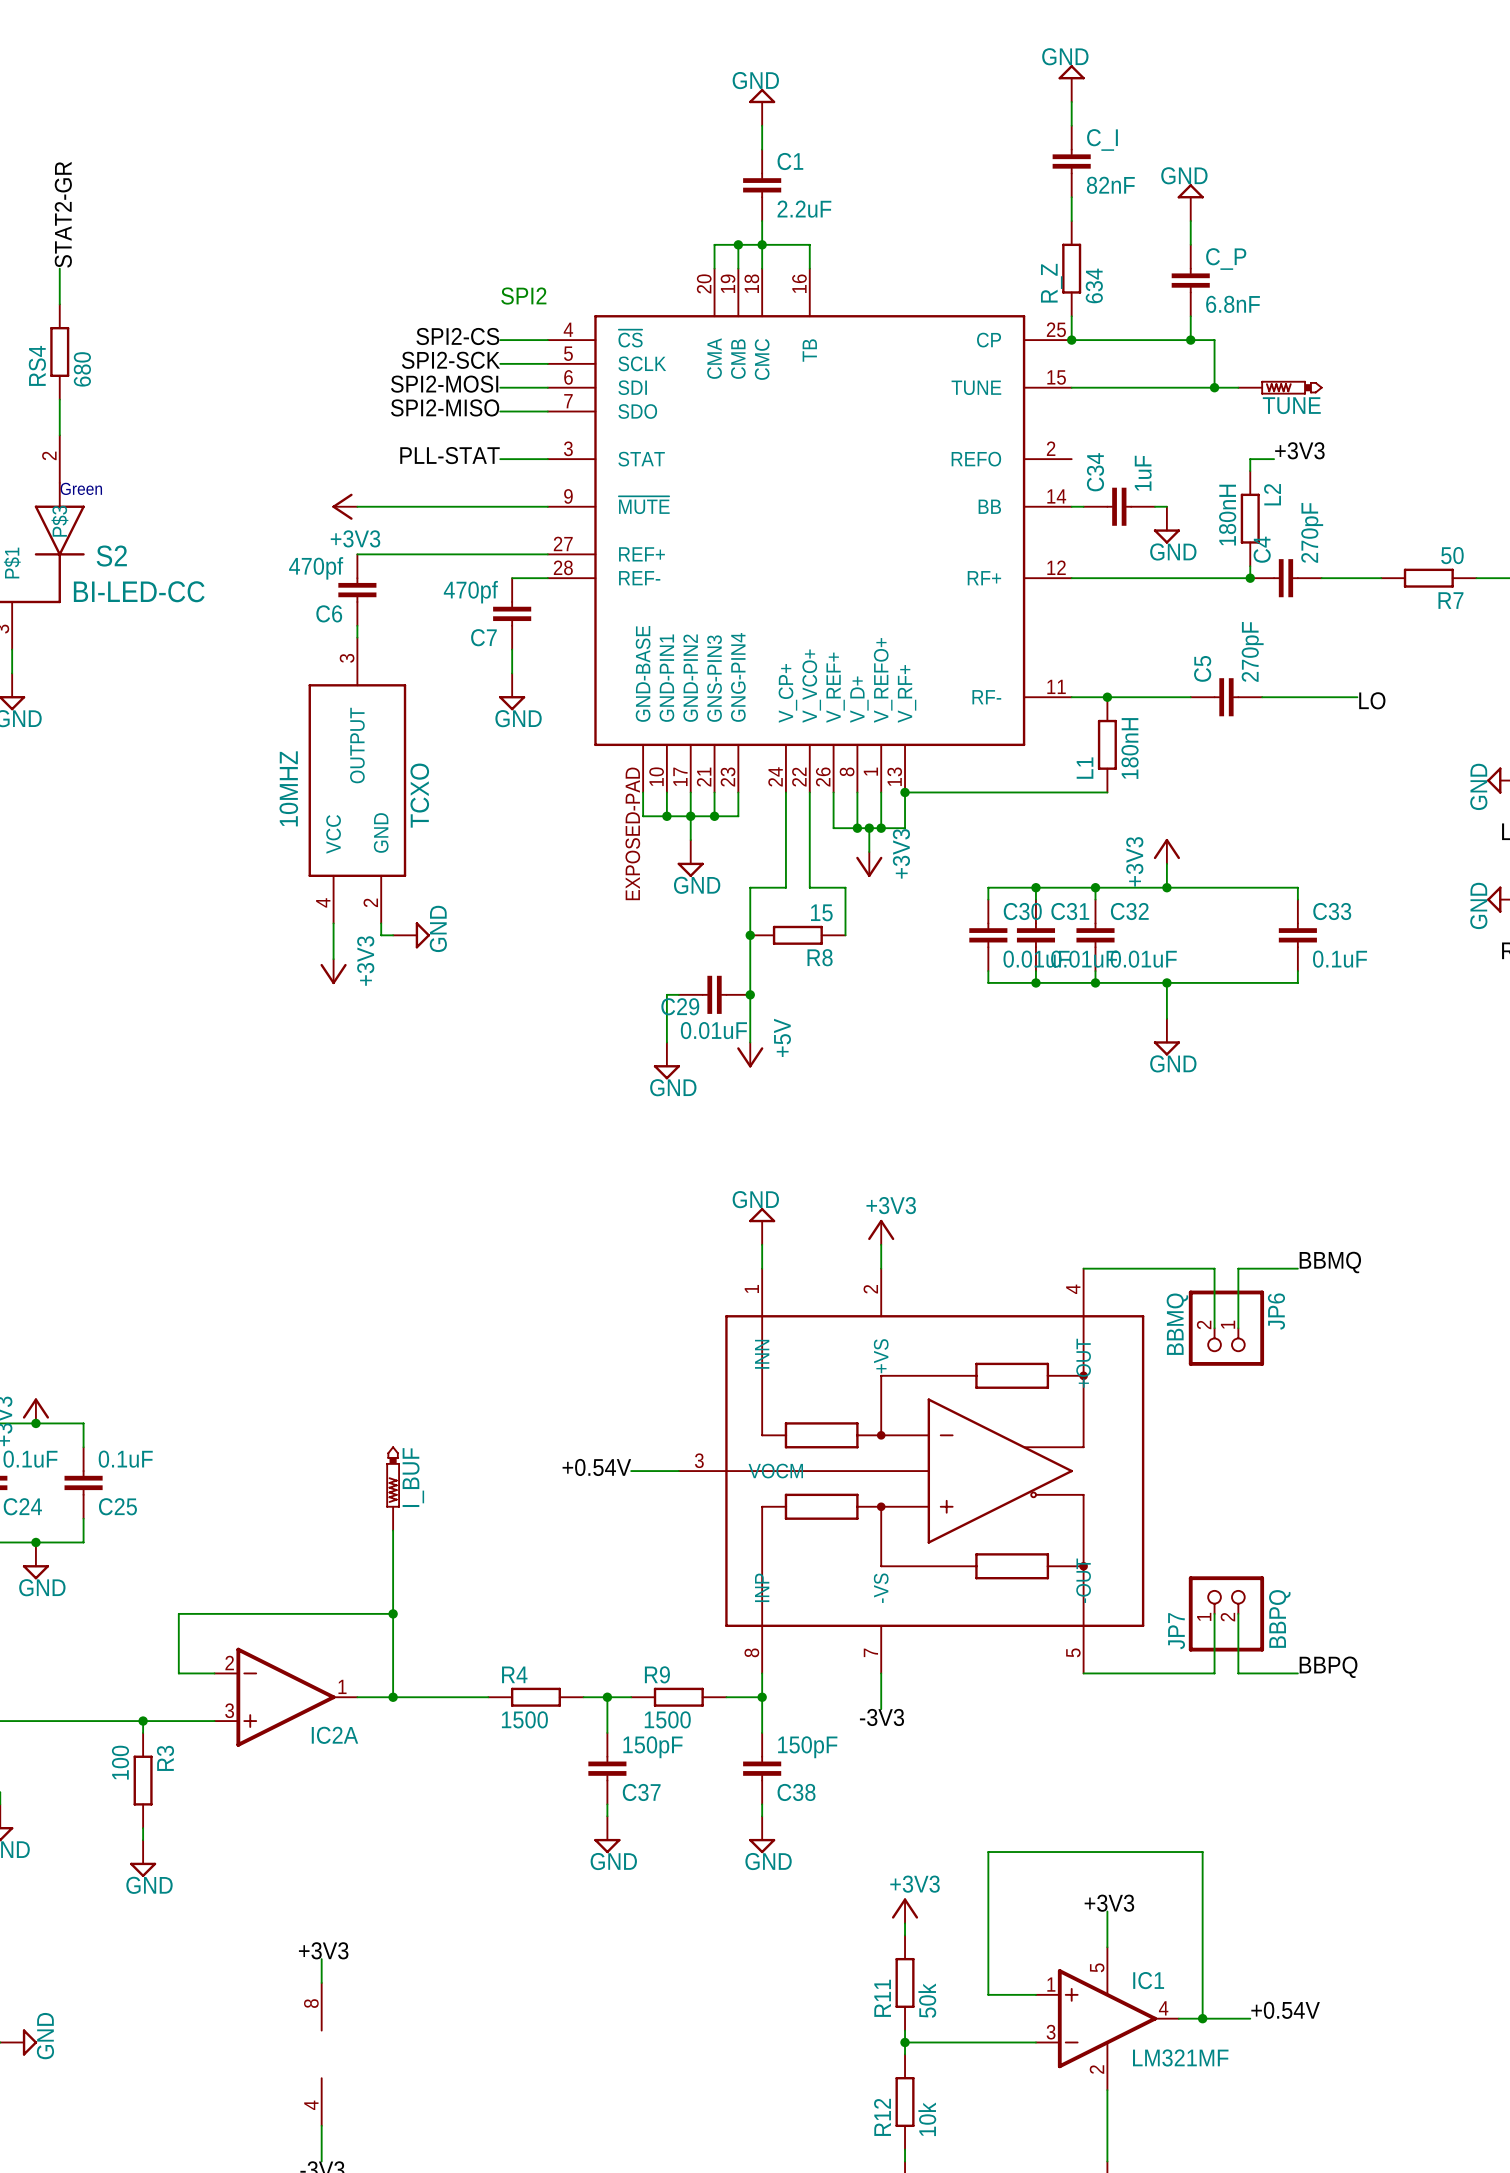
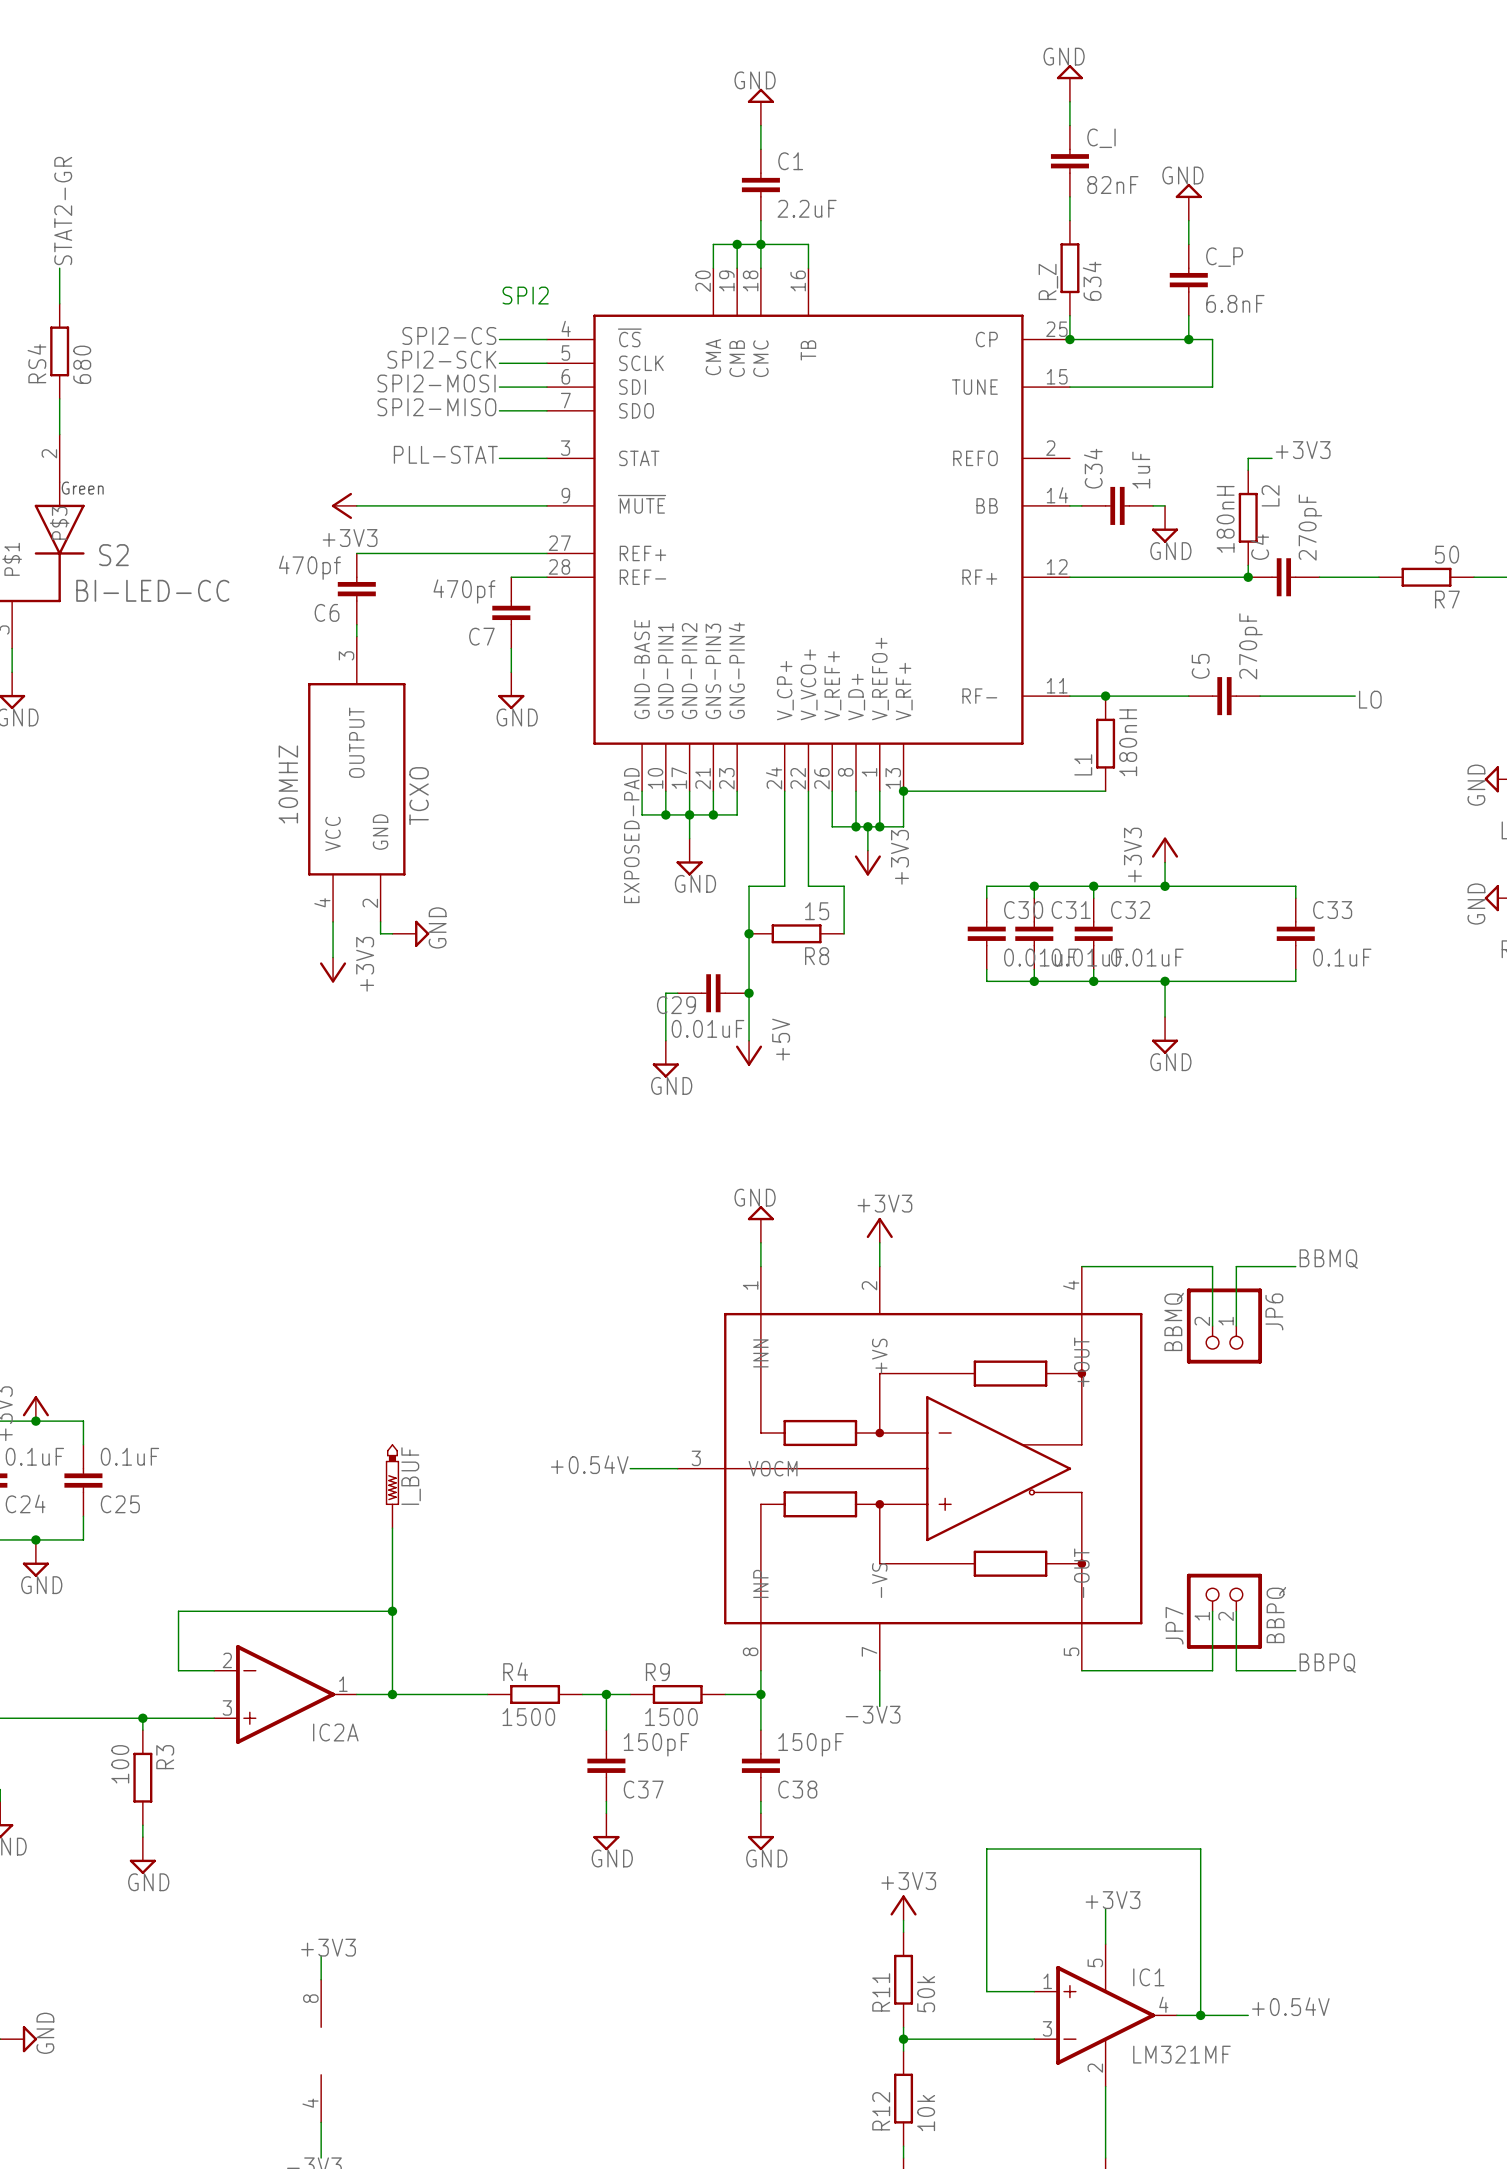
wire: (1214, 387) (1238, 387) -> none
junction: (1214, 387) -> none
TUNE: (1280, 387) -> none

